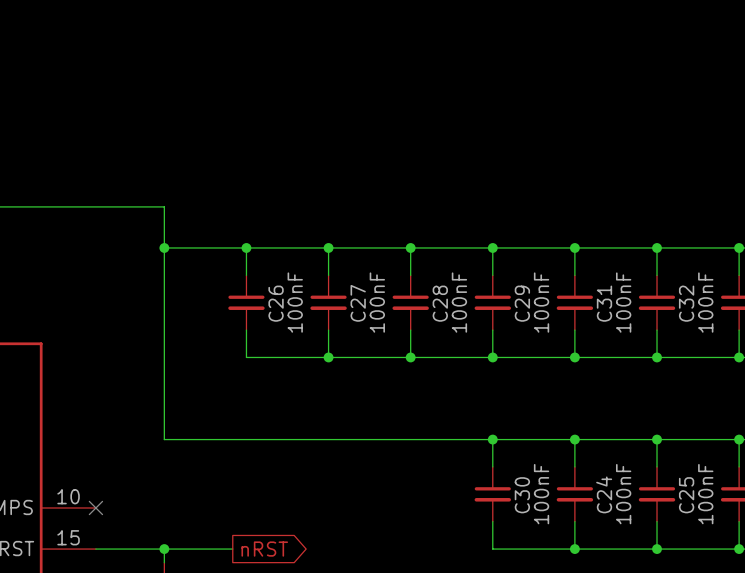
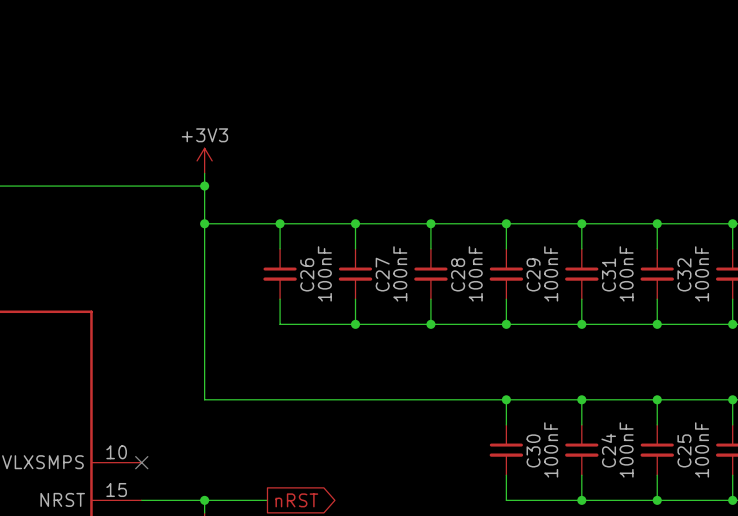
power symbol: none -> +3V3 (204, 160)
wire: none -> (204, 173) (204, 186)
junction: none -> (204, 186)

